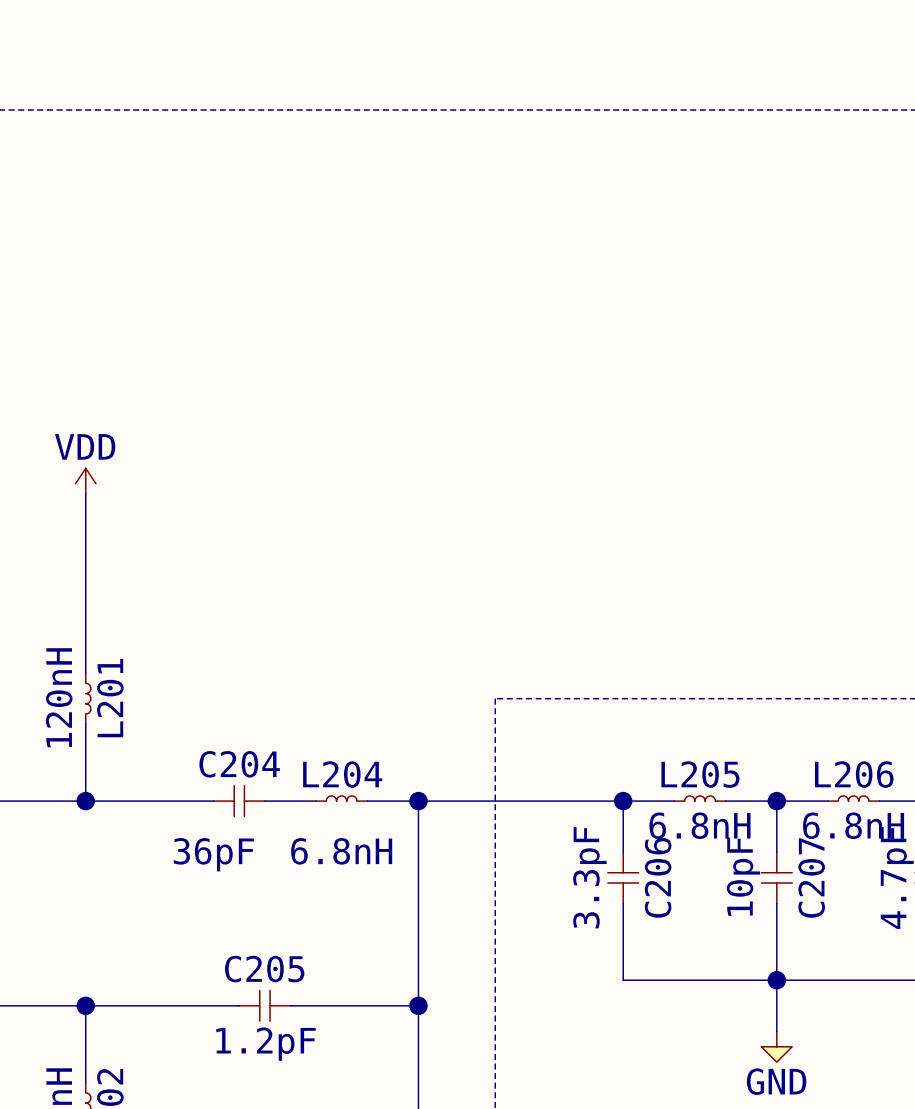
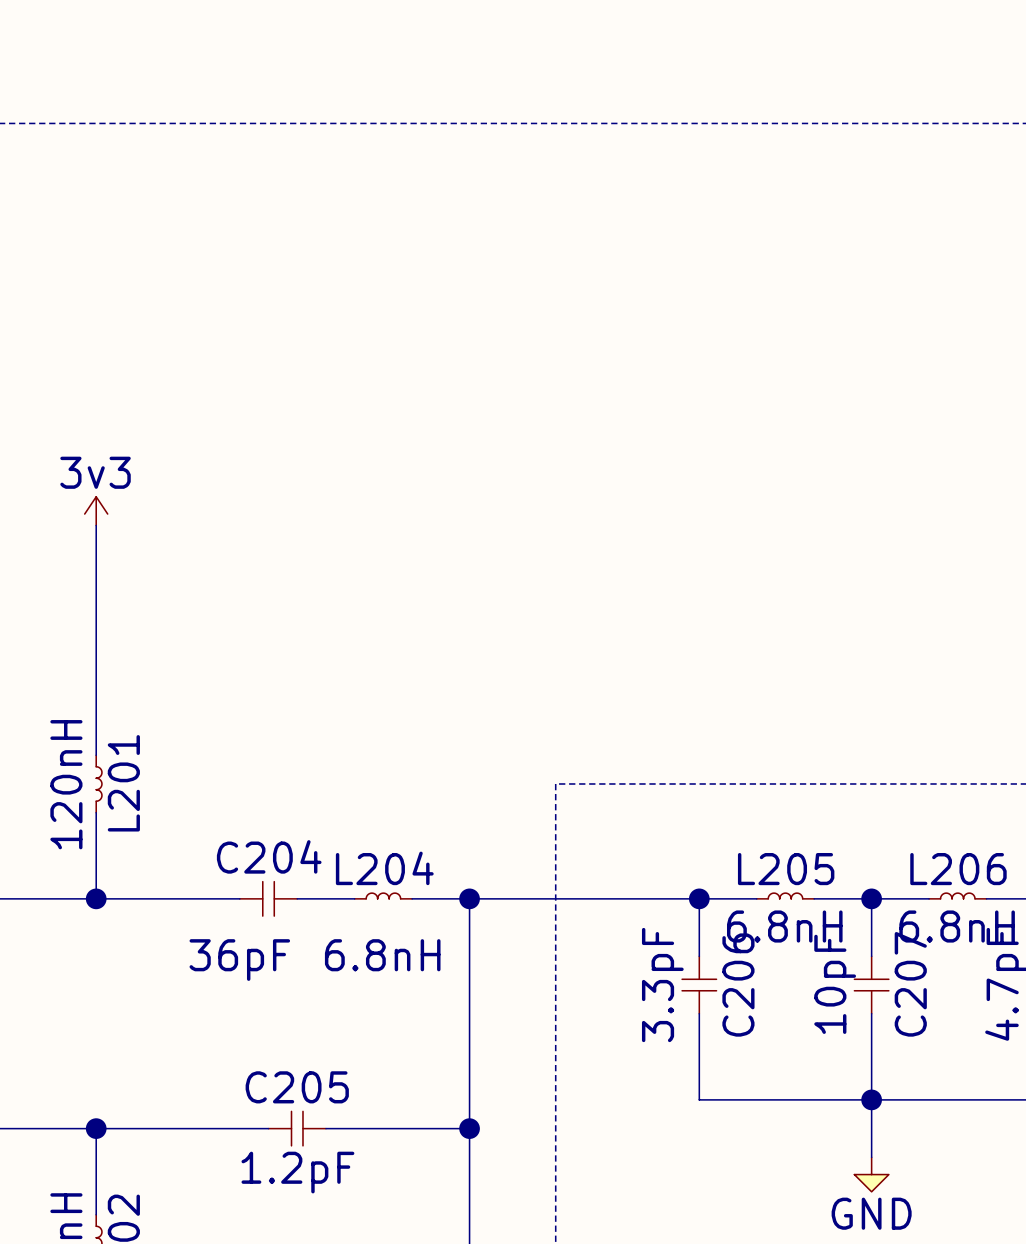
power symbol: none -> 3v3 (96, 511)
power symbol: VDD (85, 481) -> none

